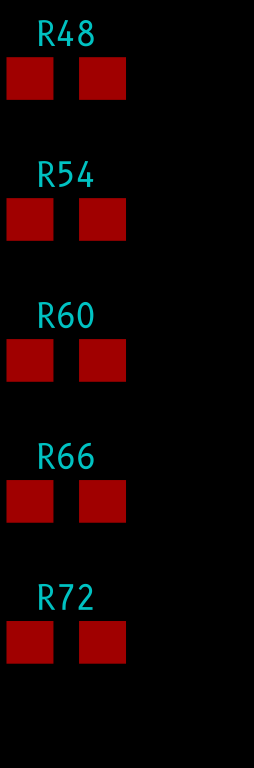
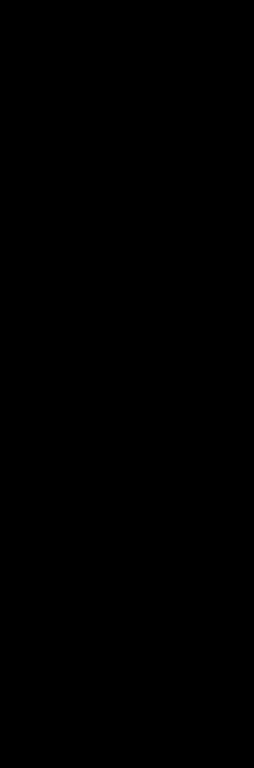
R48: (66, 78) -> none
R54: (66, 219) -> none
R60: (66, 360) -> none
R66: (66, 501) -> none
R72: (66, 642) -> none

